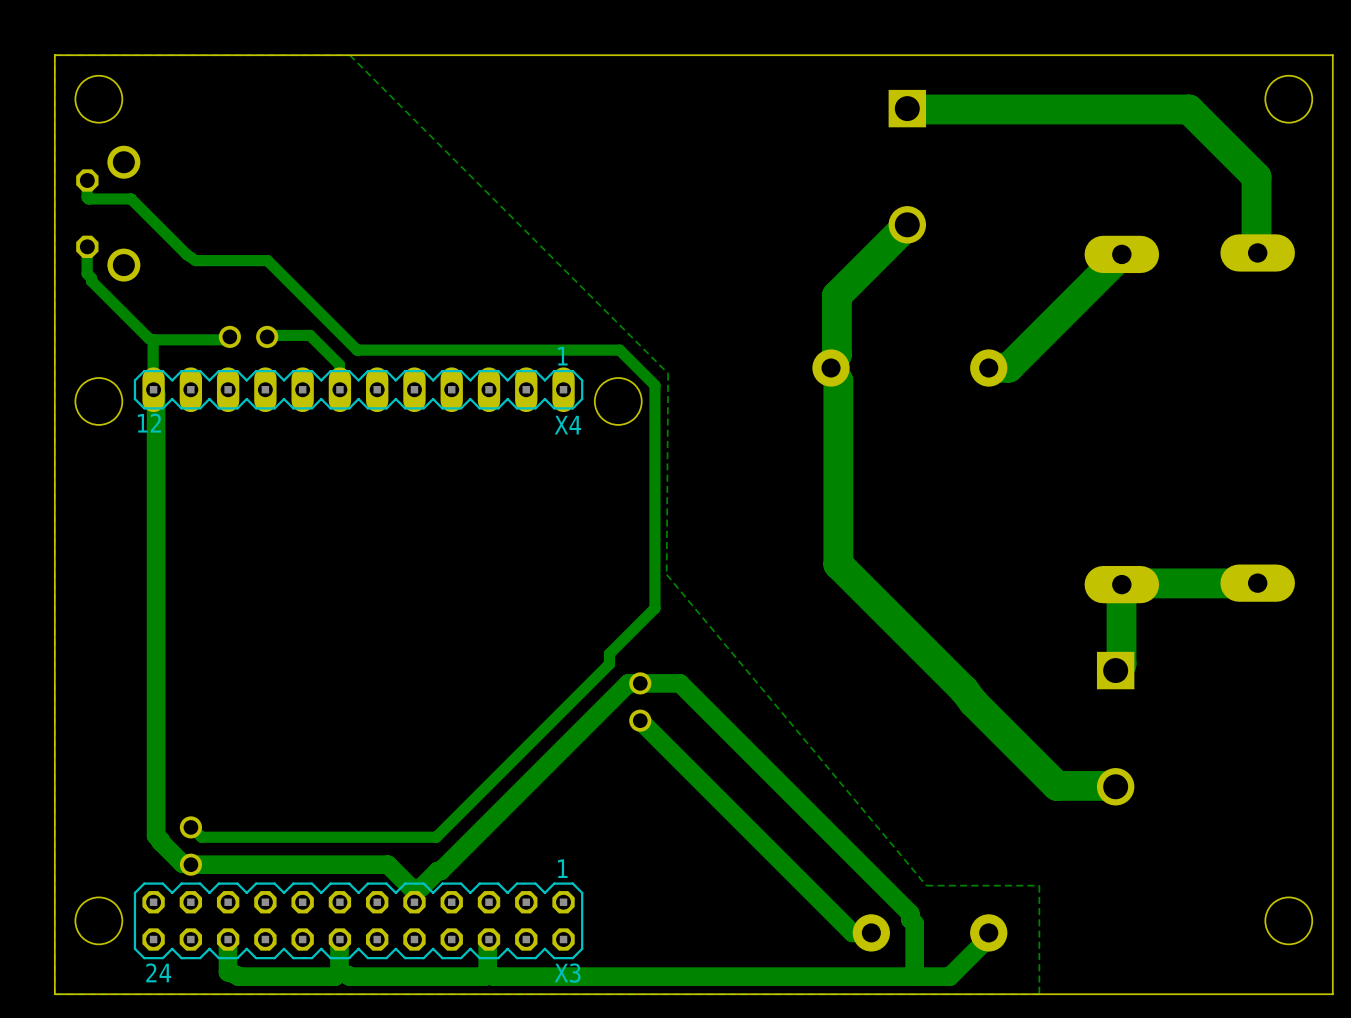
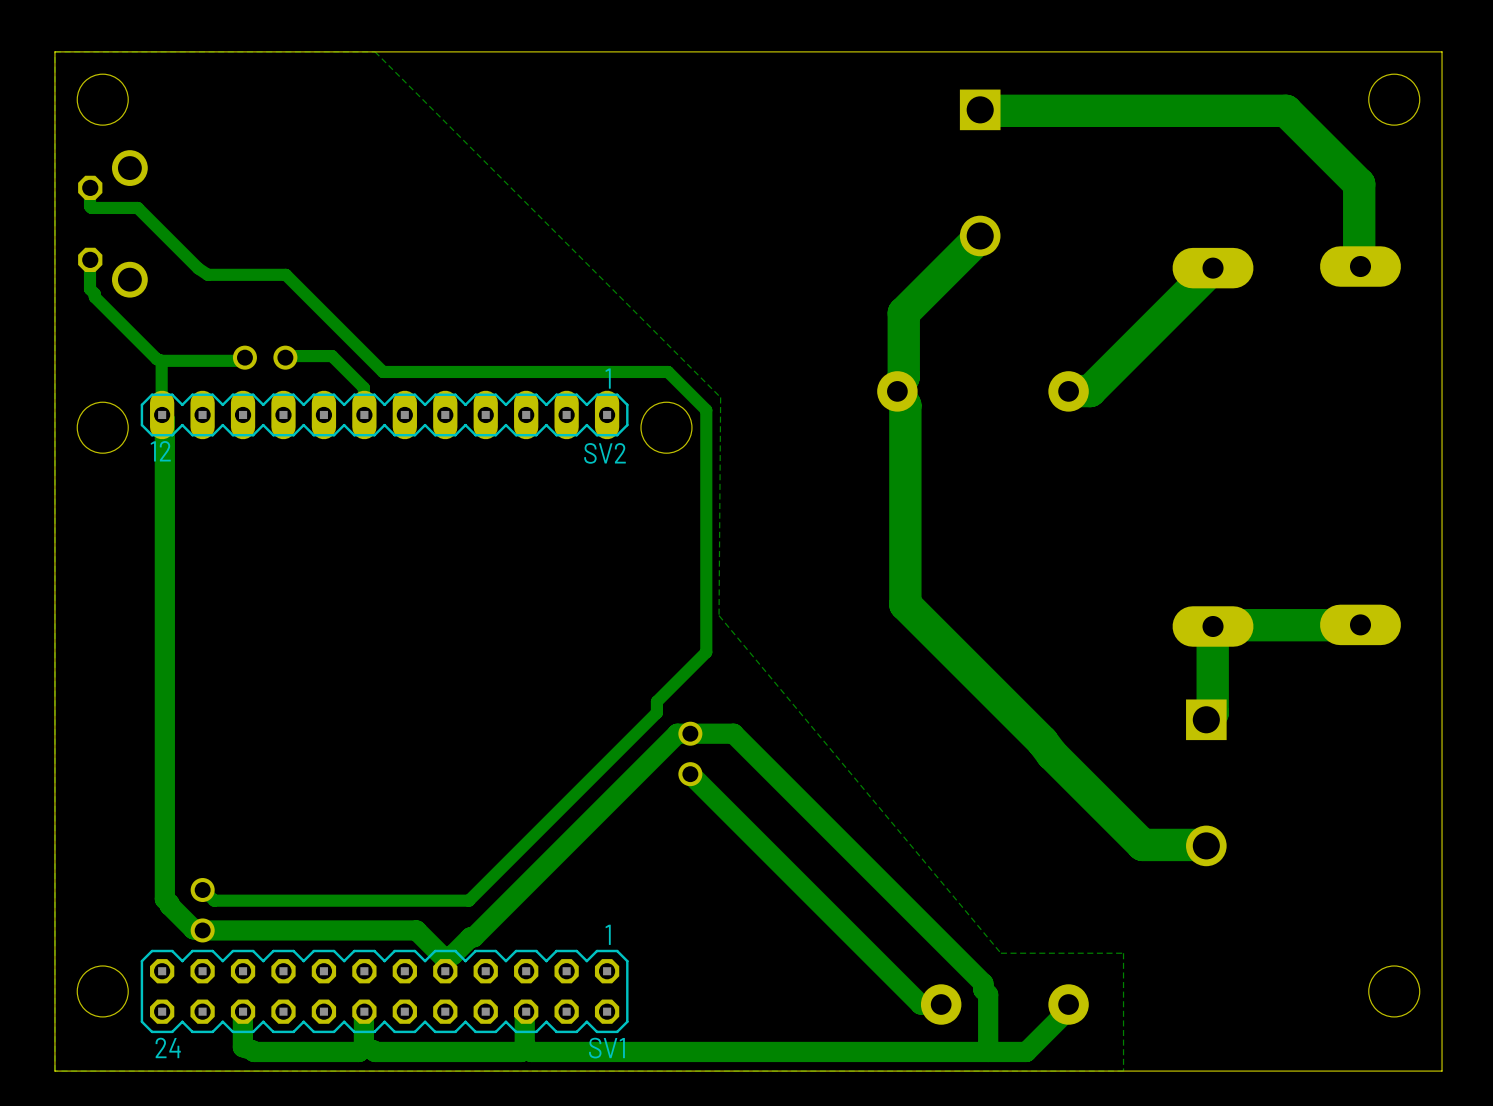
X4 name: X4 (567, 425) -> SV2 (605, 453)
X3 name: X3 (567, 973) -> SV1 (606, 1048)

